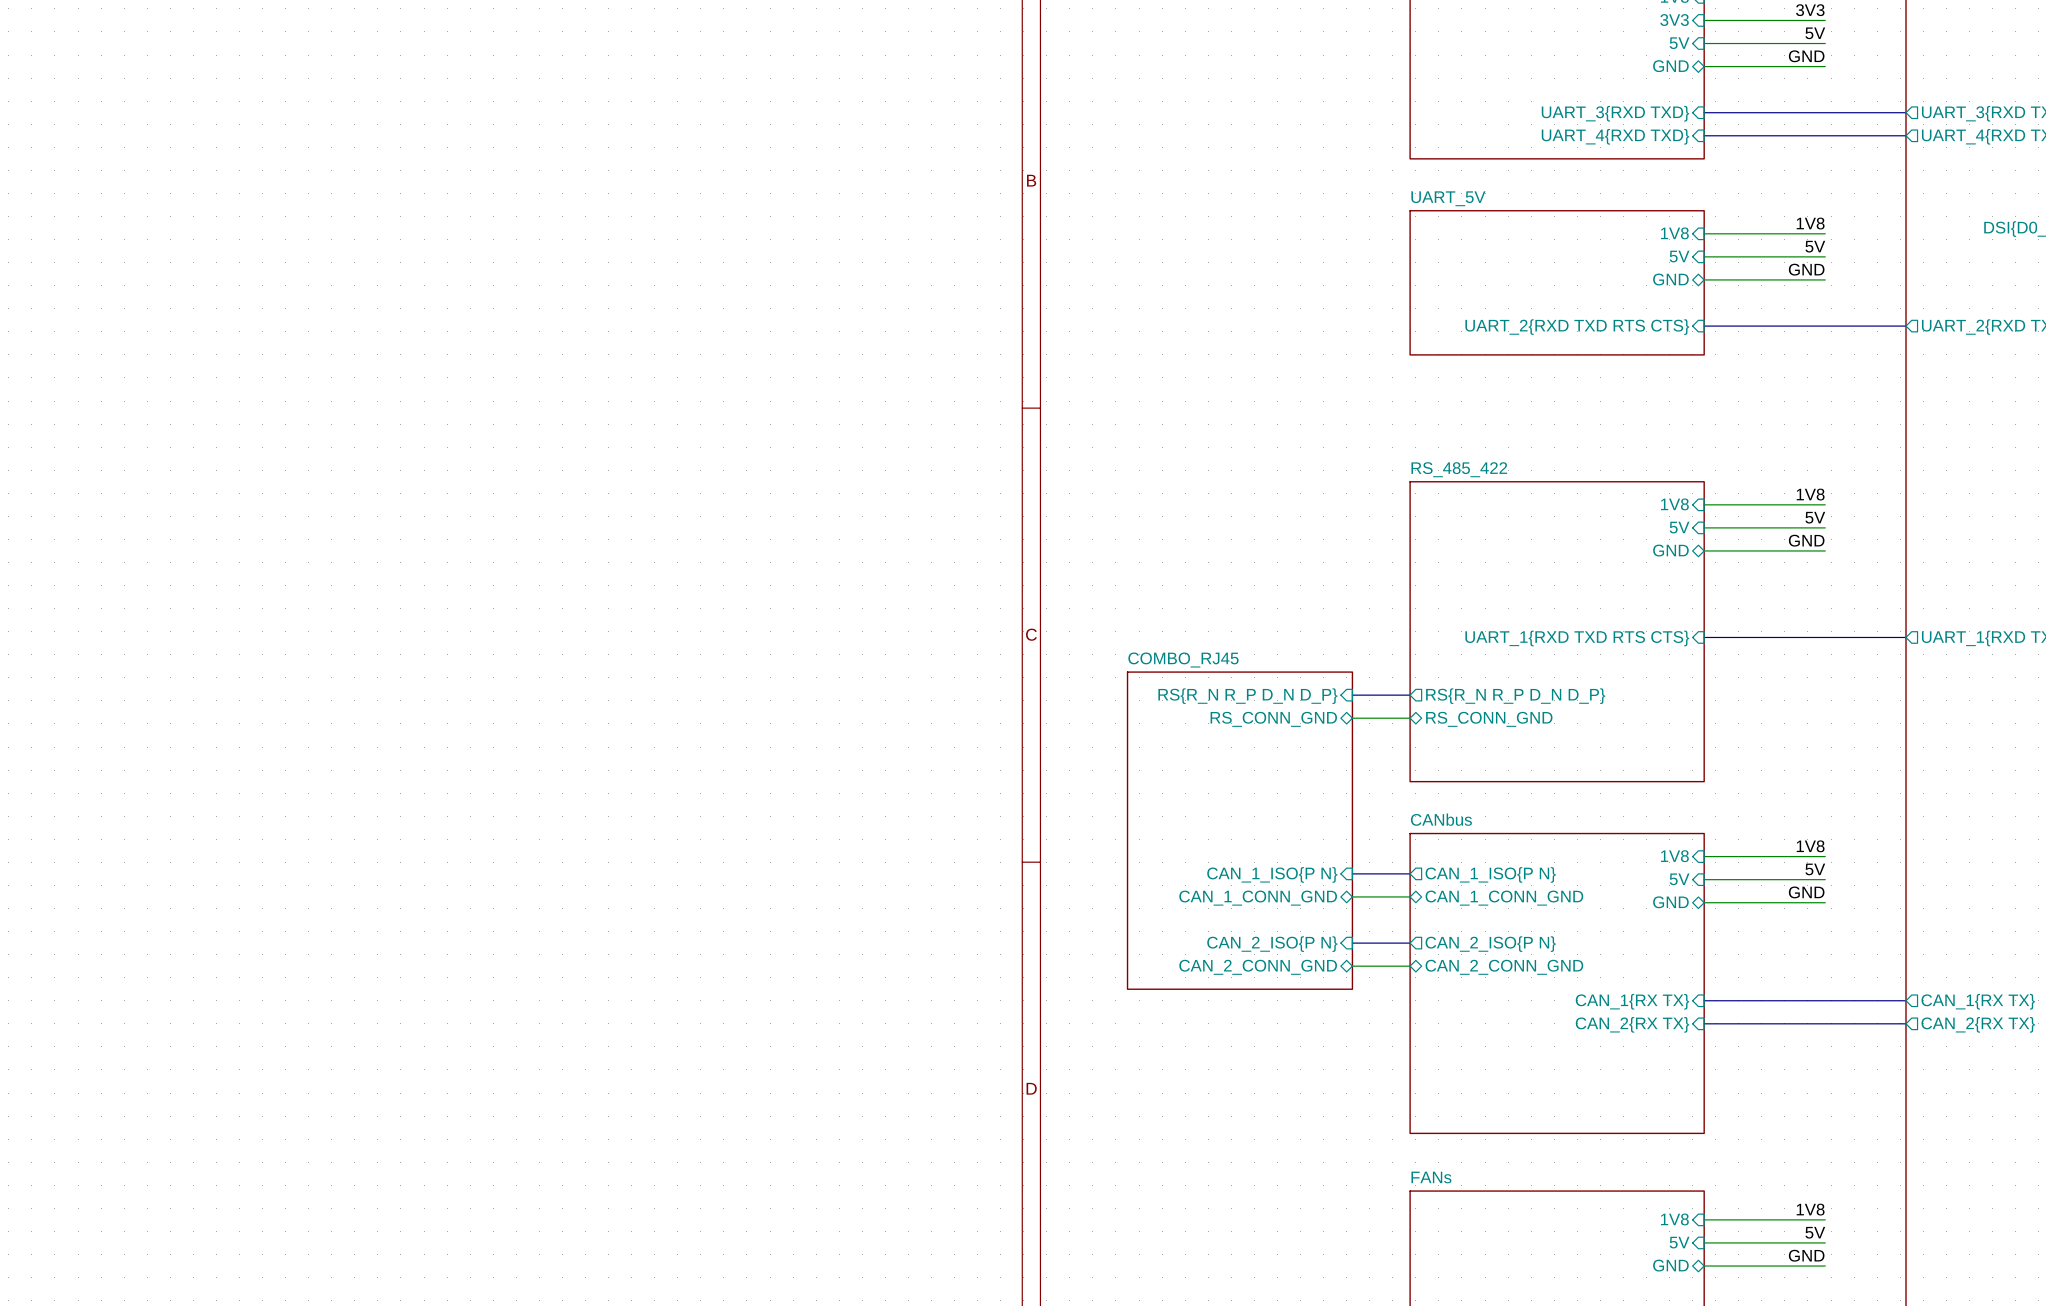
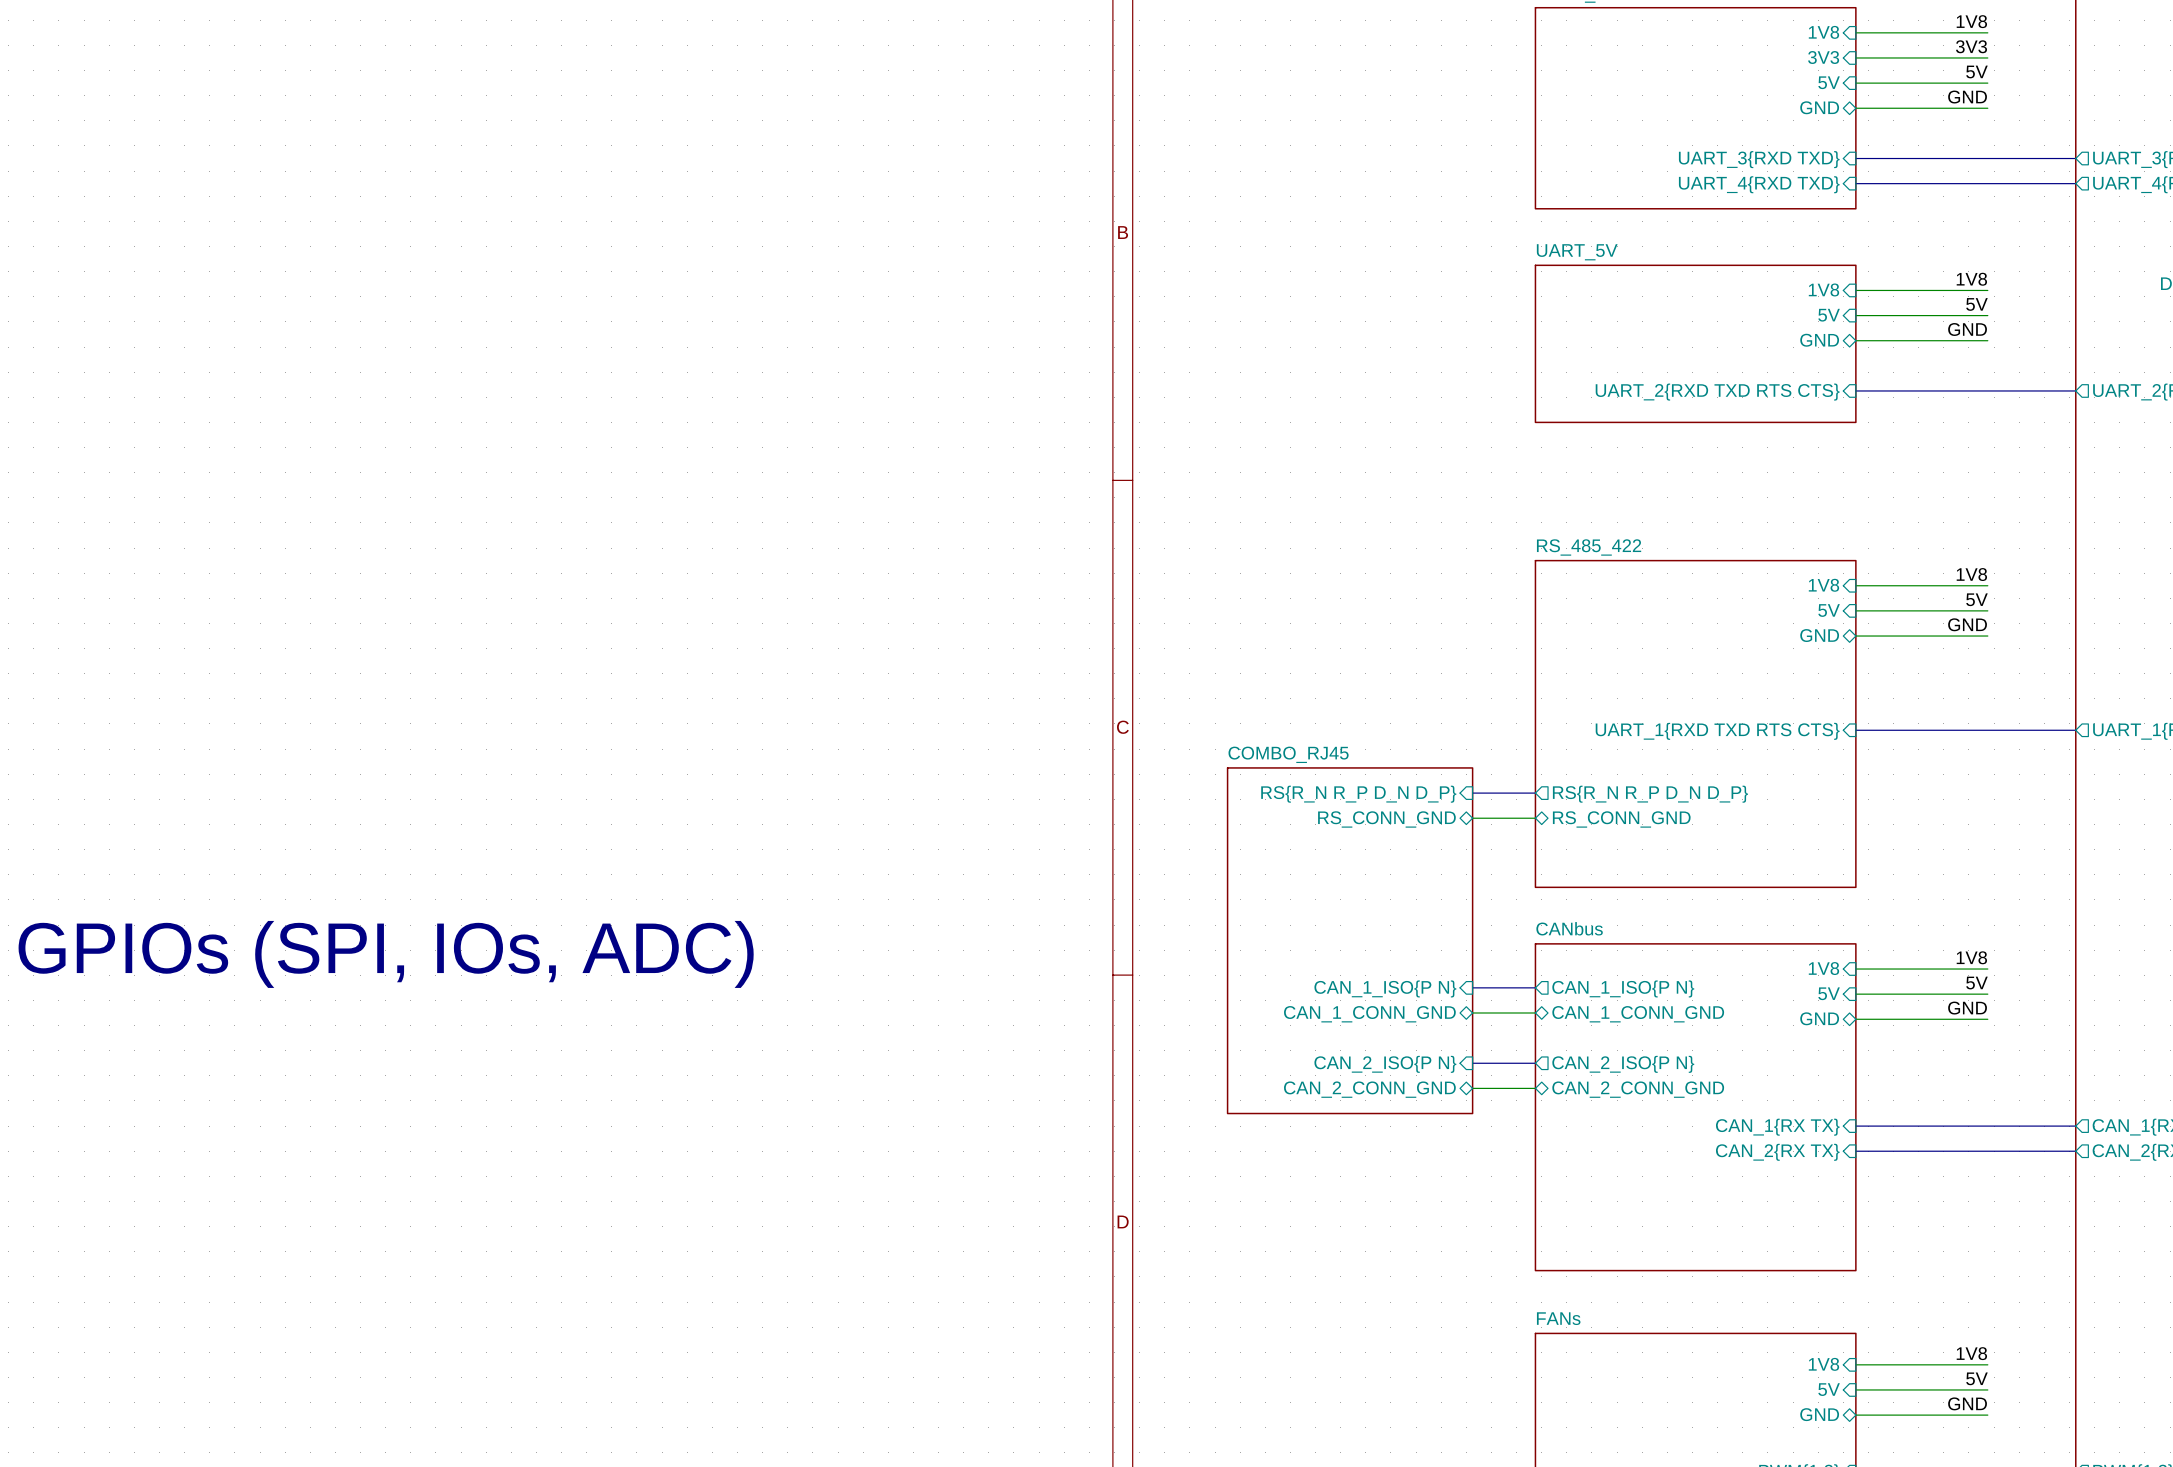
text: none -> GPIOs (SPI, IOs, ADC) (386, 954)

